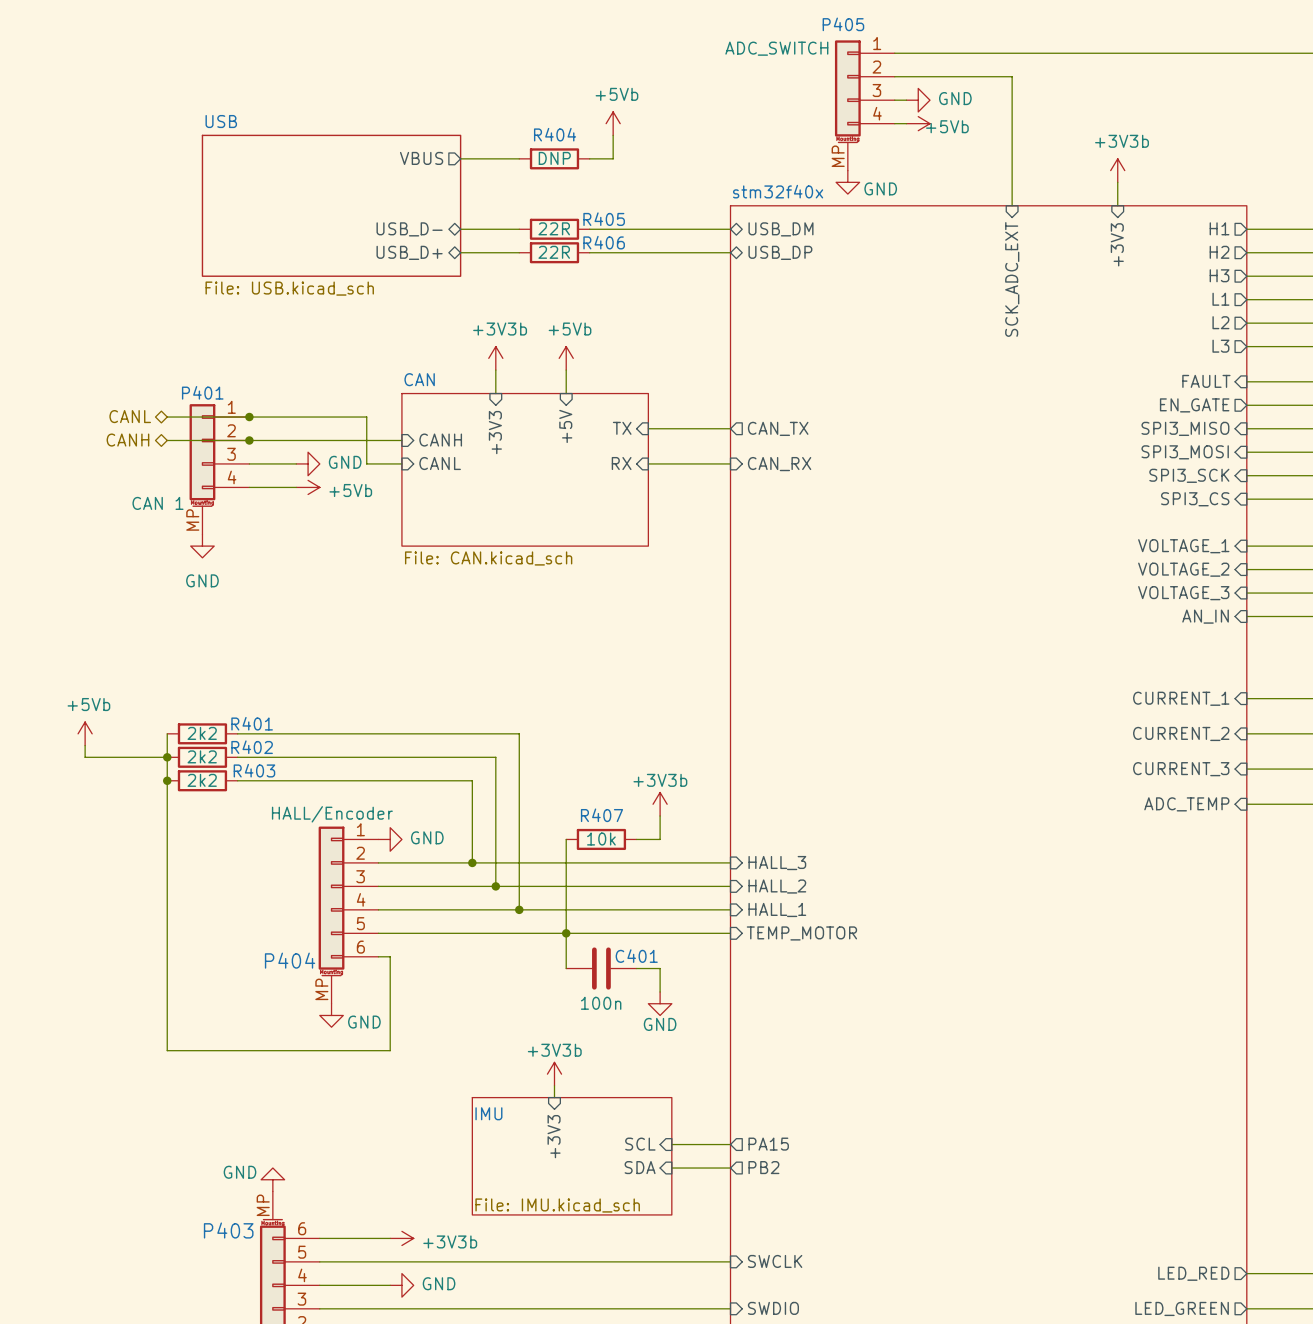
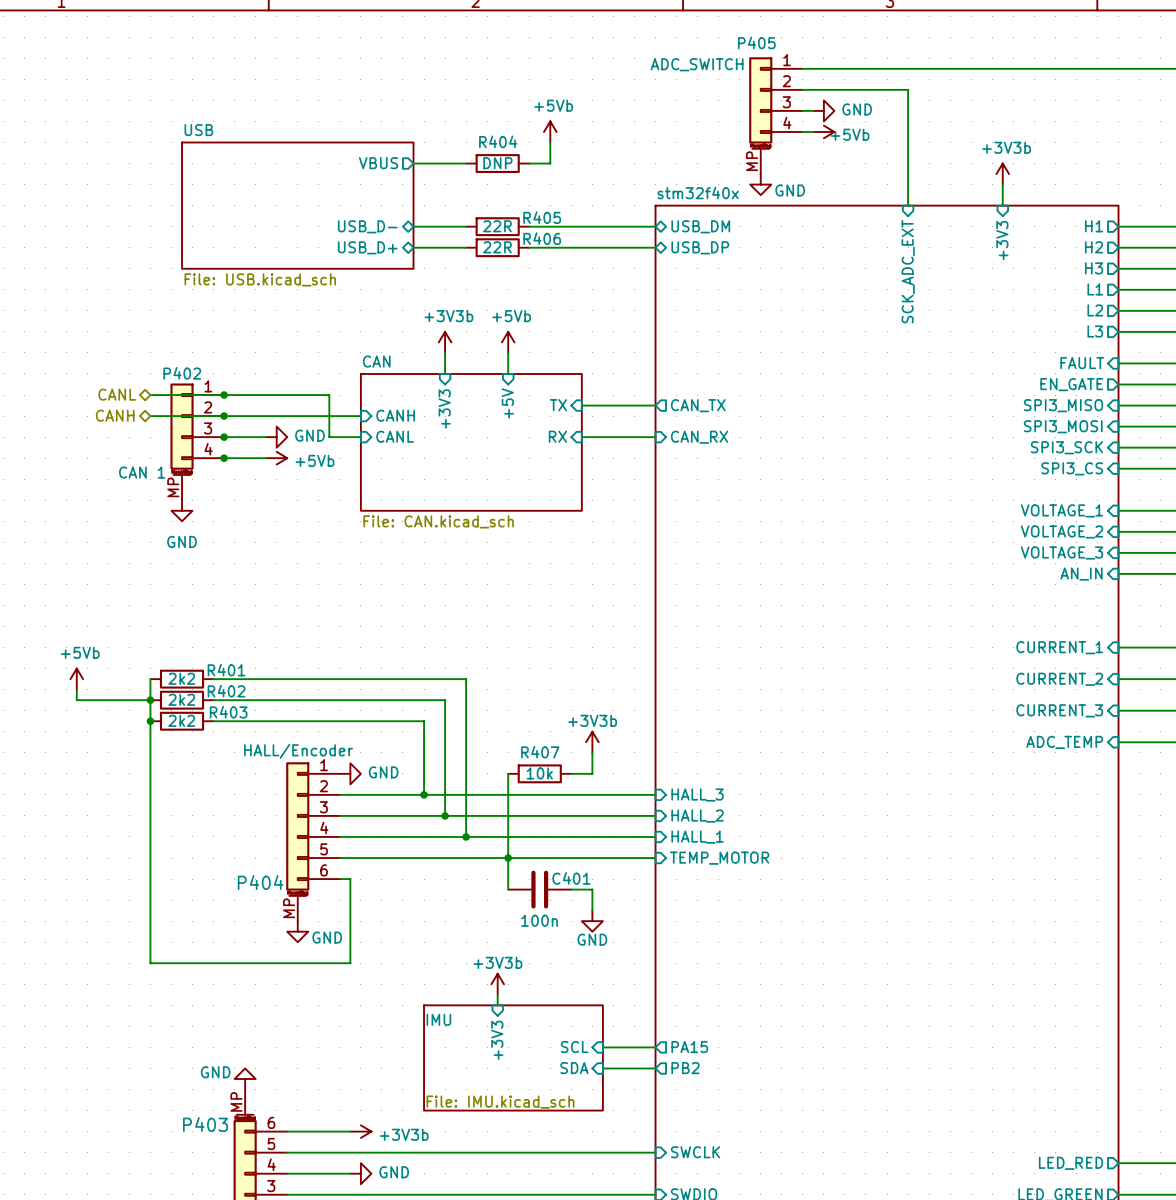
P401 name: P401 (202, 392) -> P402 (182, 373)
junction: none -> (224, 437)
junction: none -> (224, 458)

